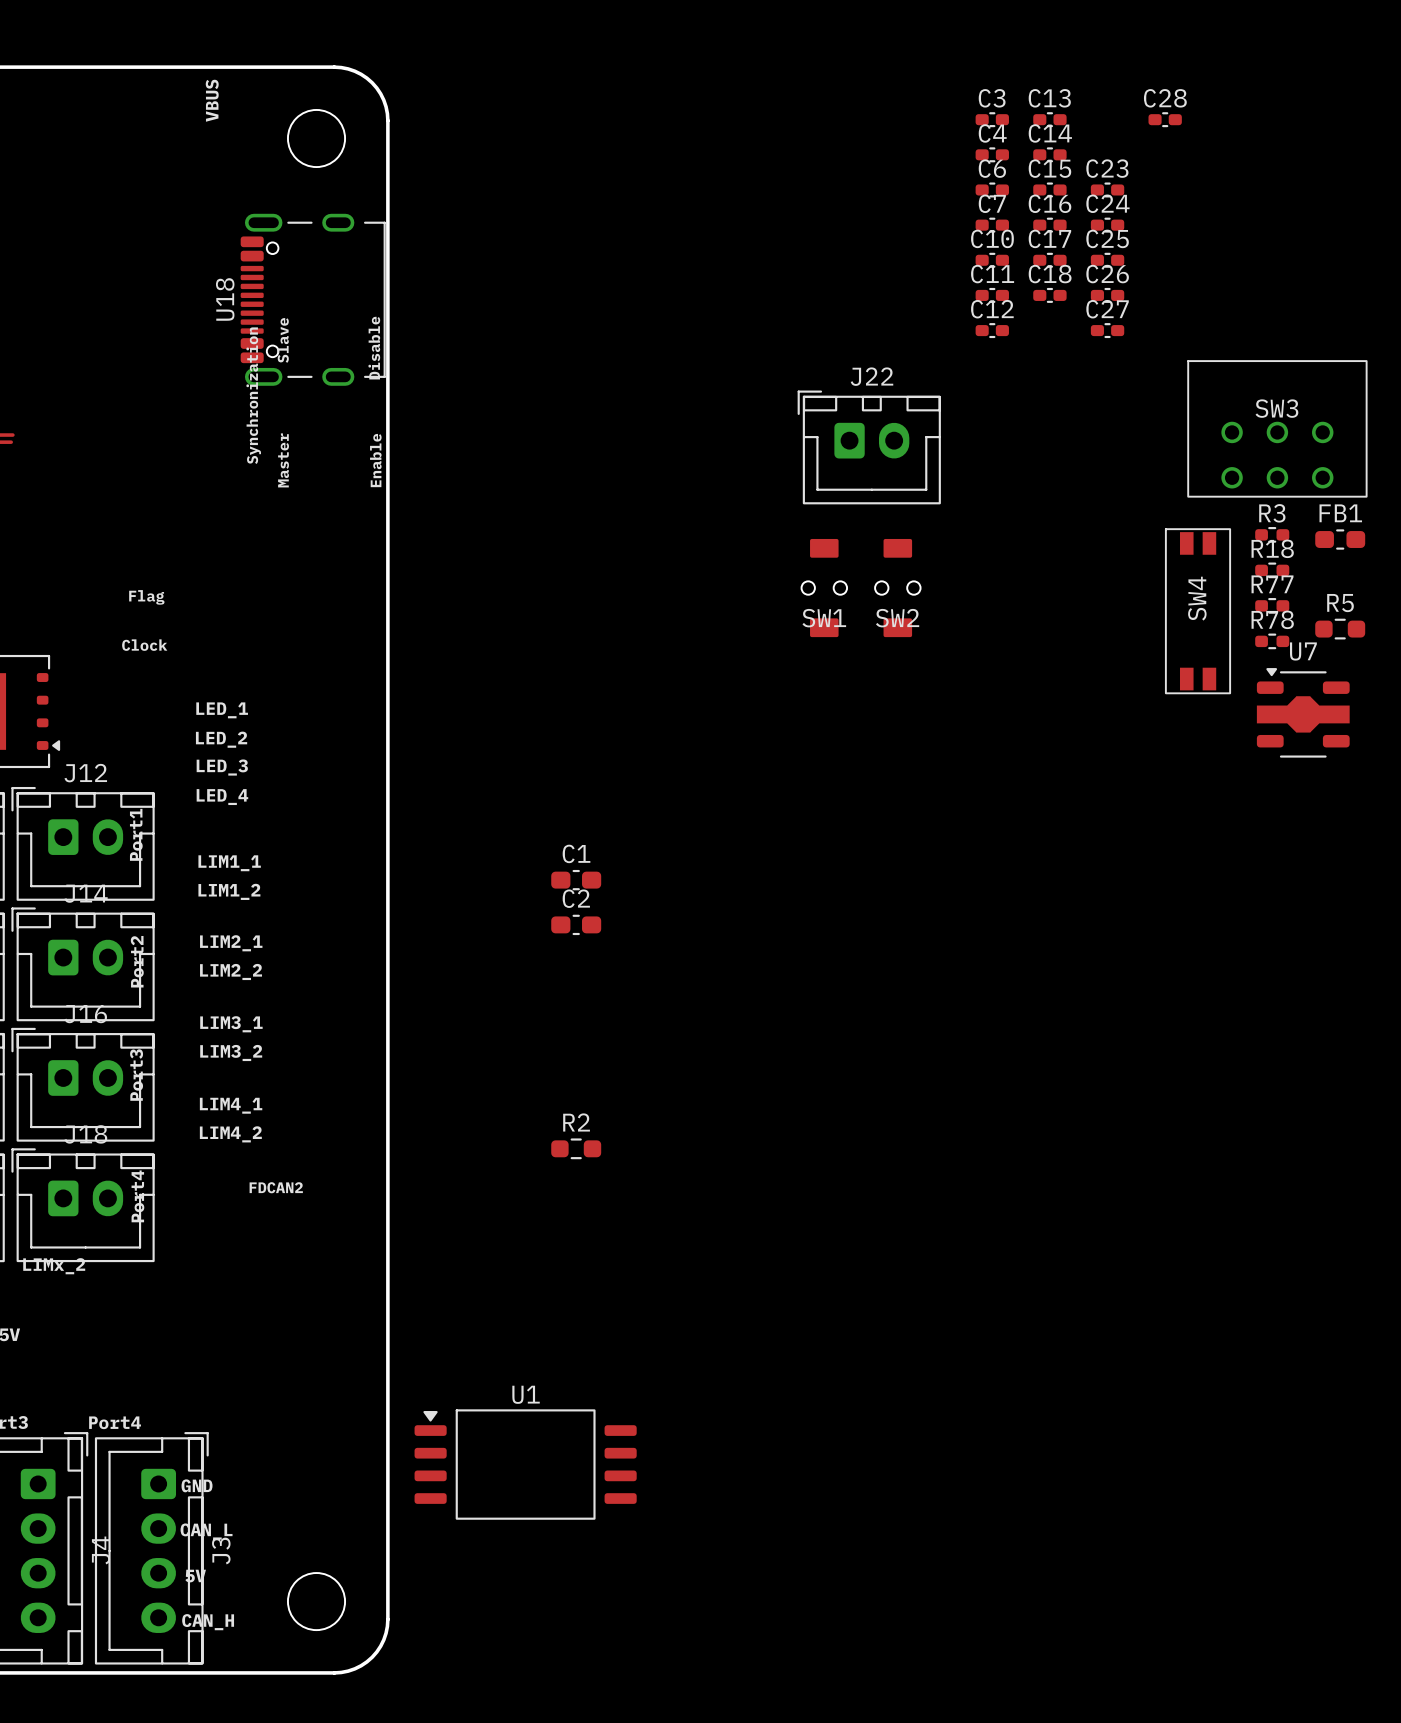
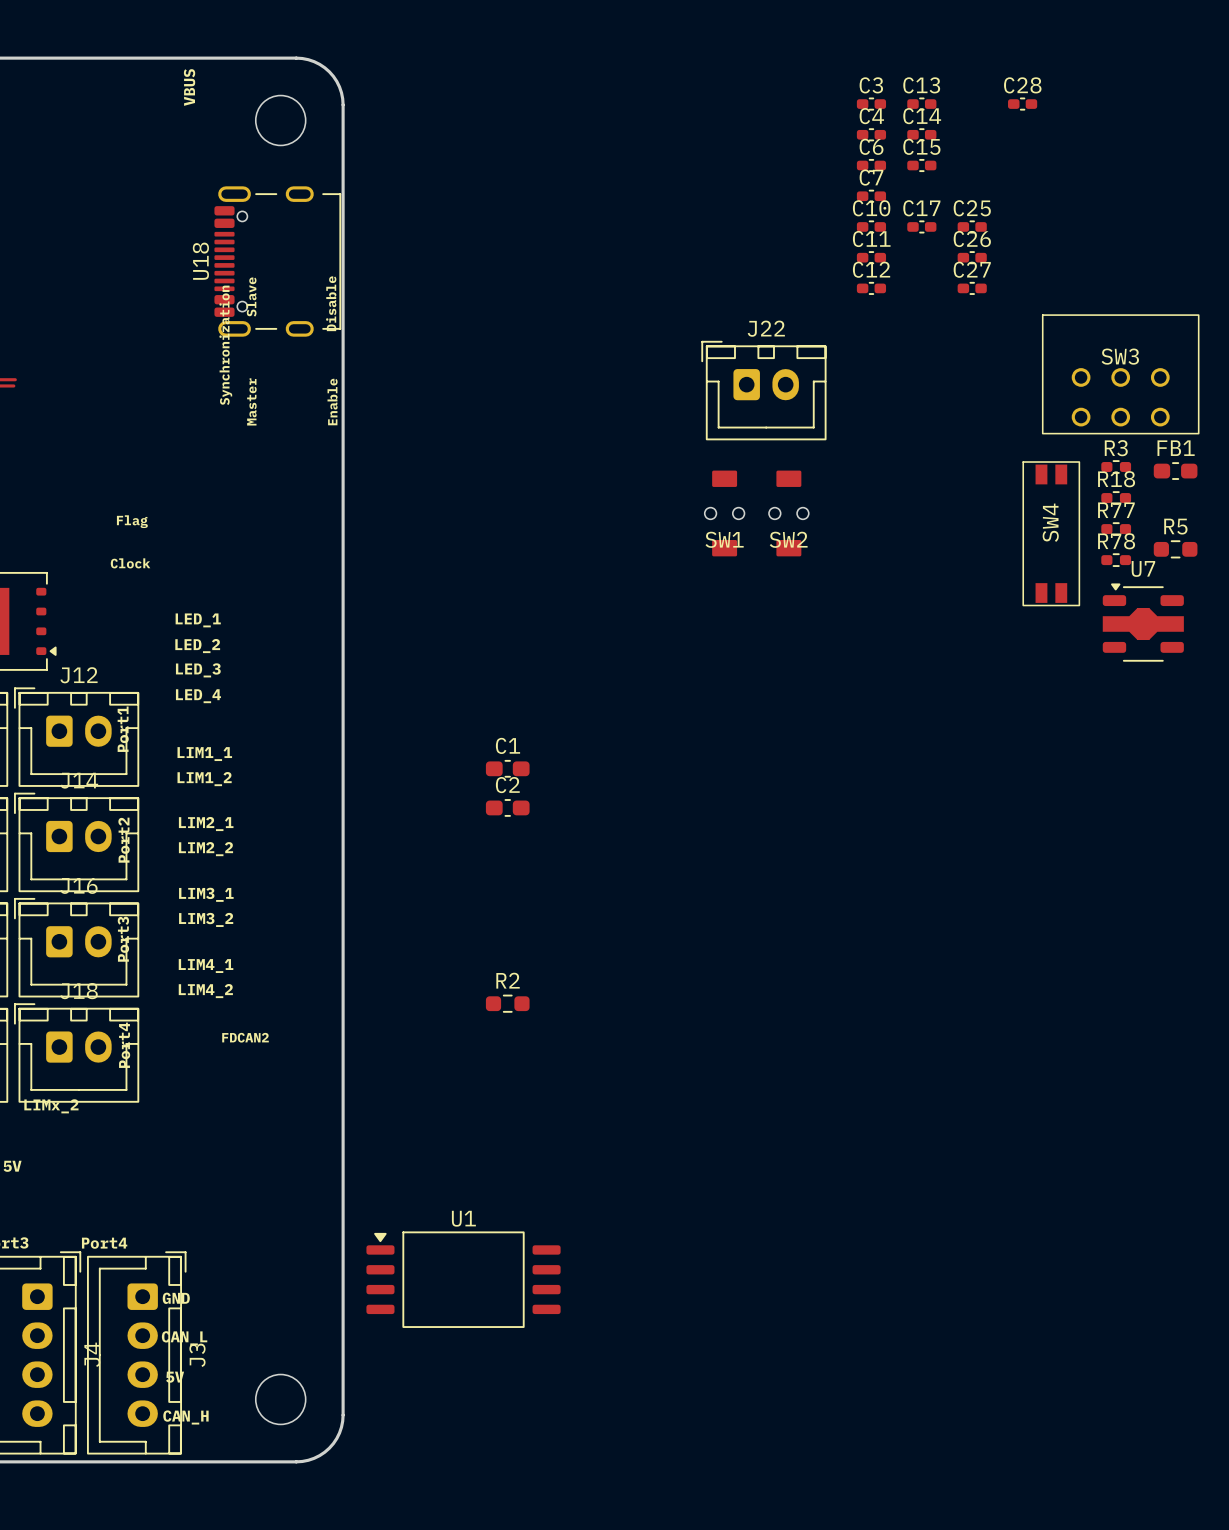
C23: (1107, 189) -> none
C16: (1049, 225) -> none
C24: (1107, 225) -> none
C18: (1049, 295) -> none

